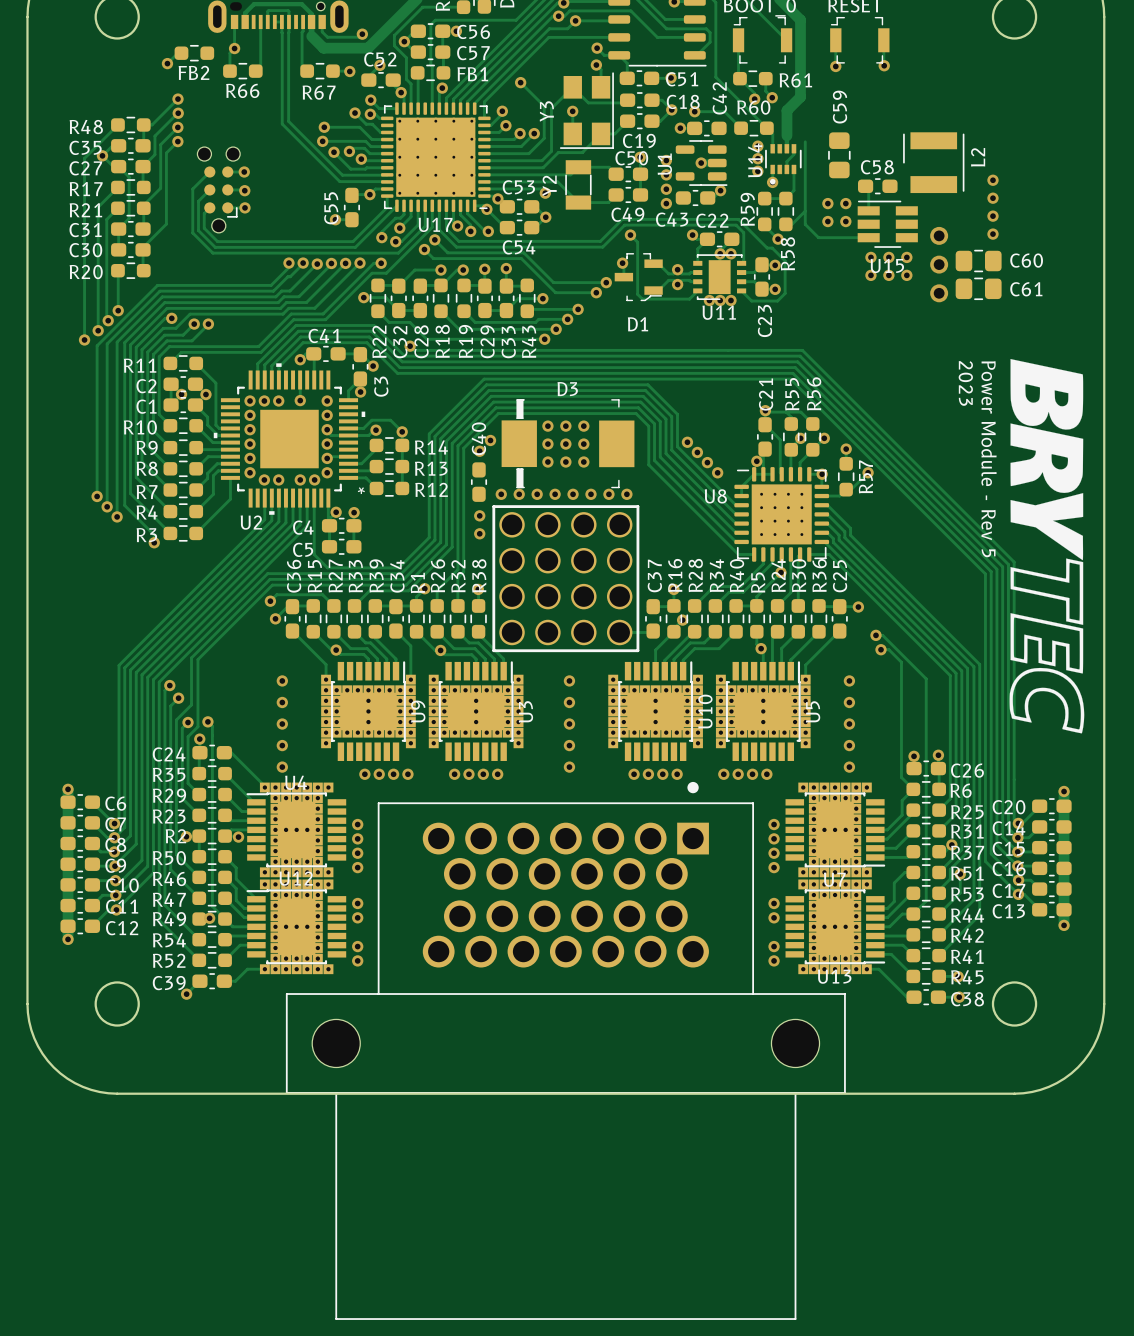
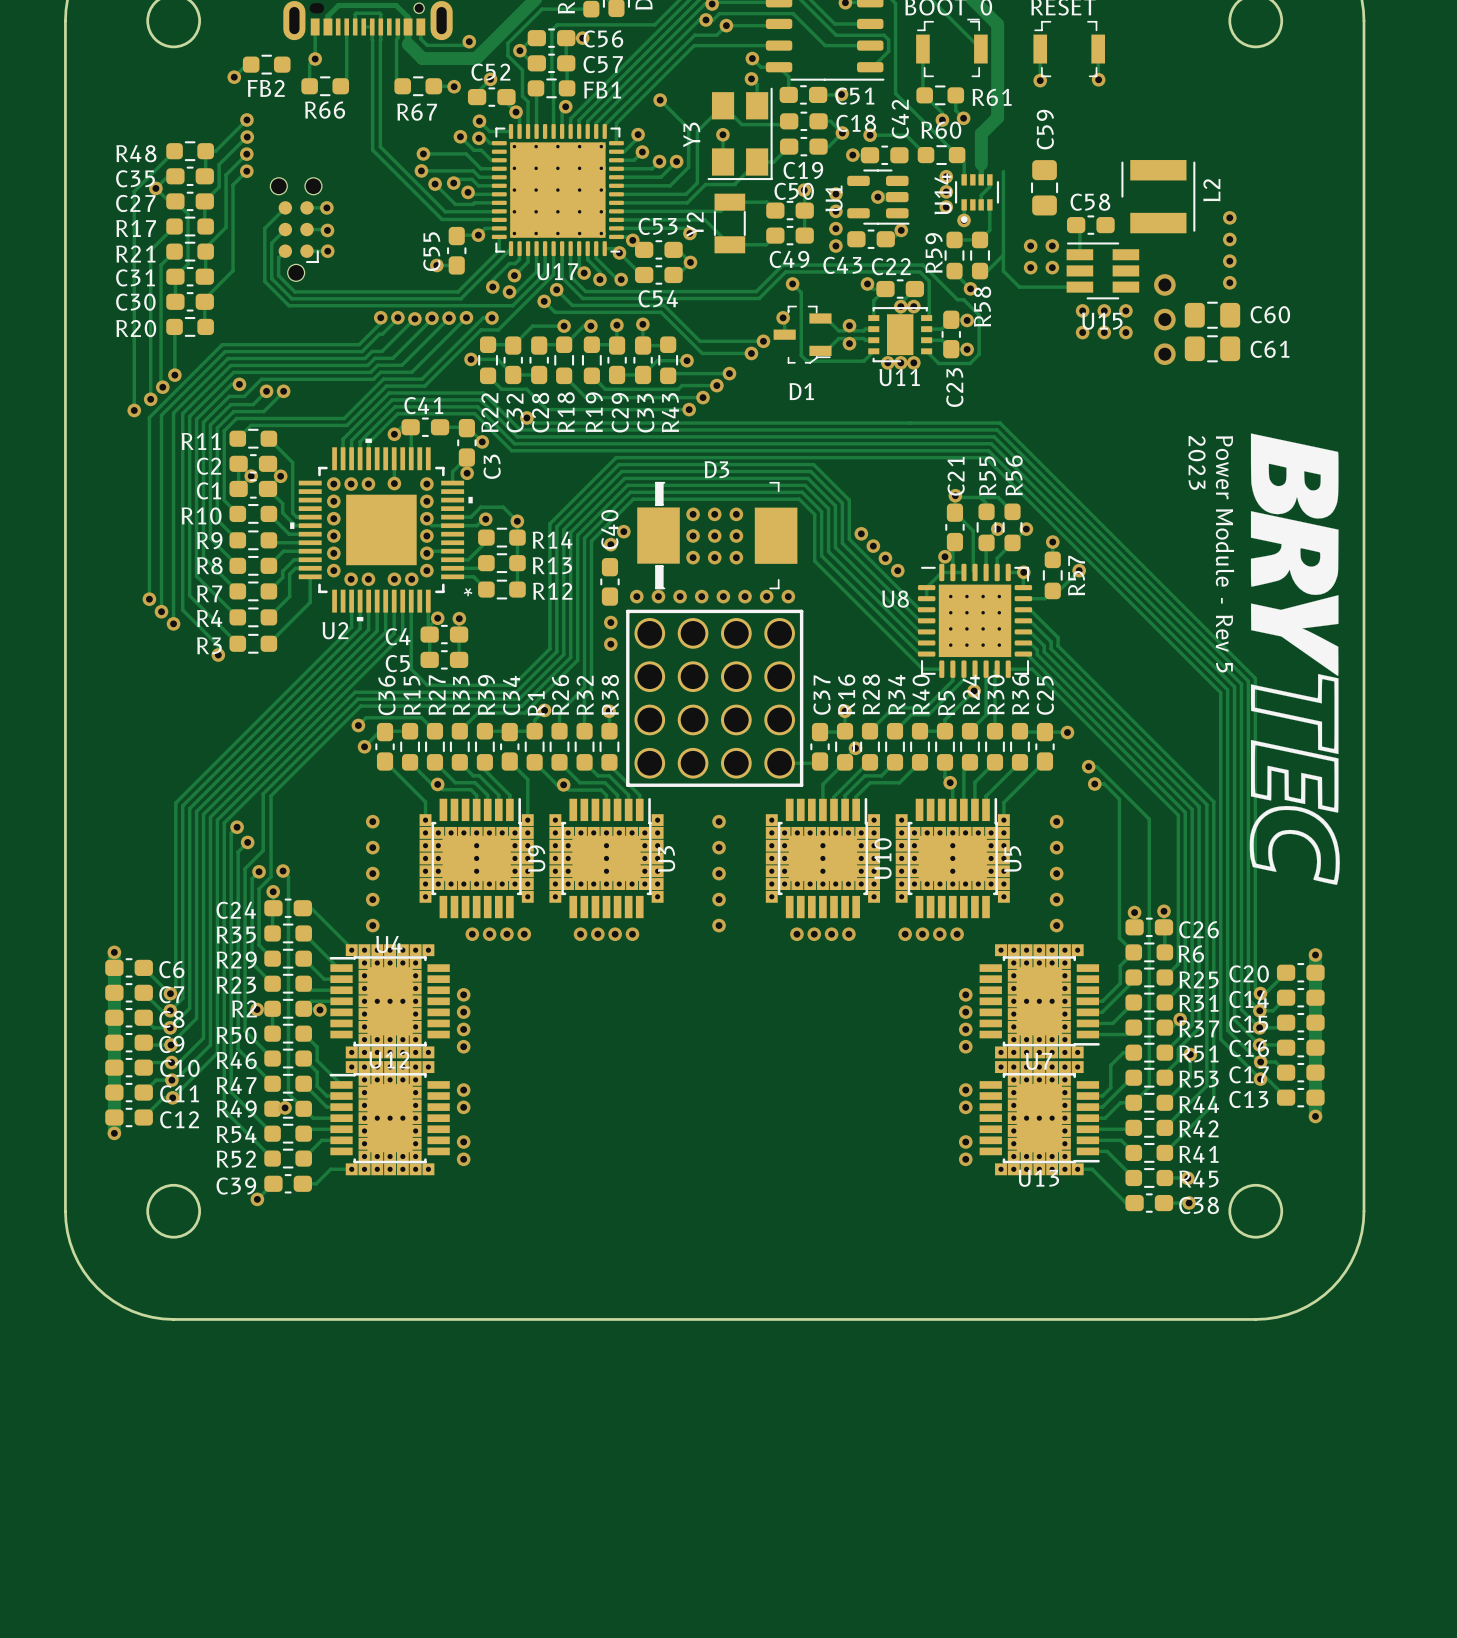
part: (565, 1050) -> none

